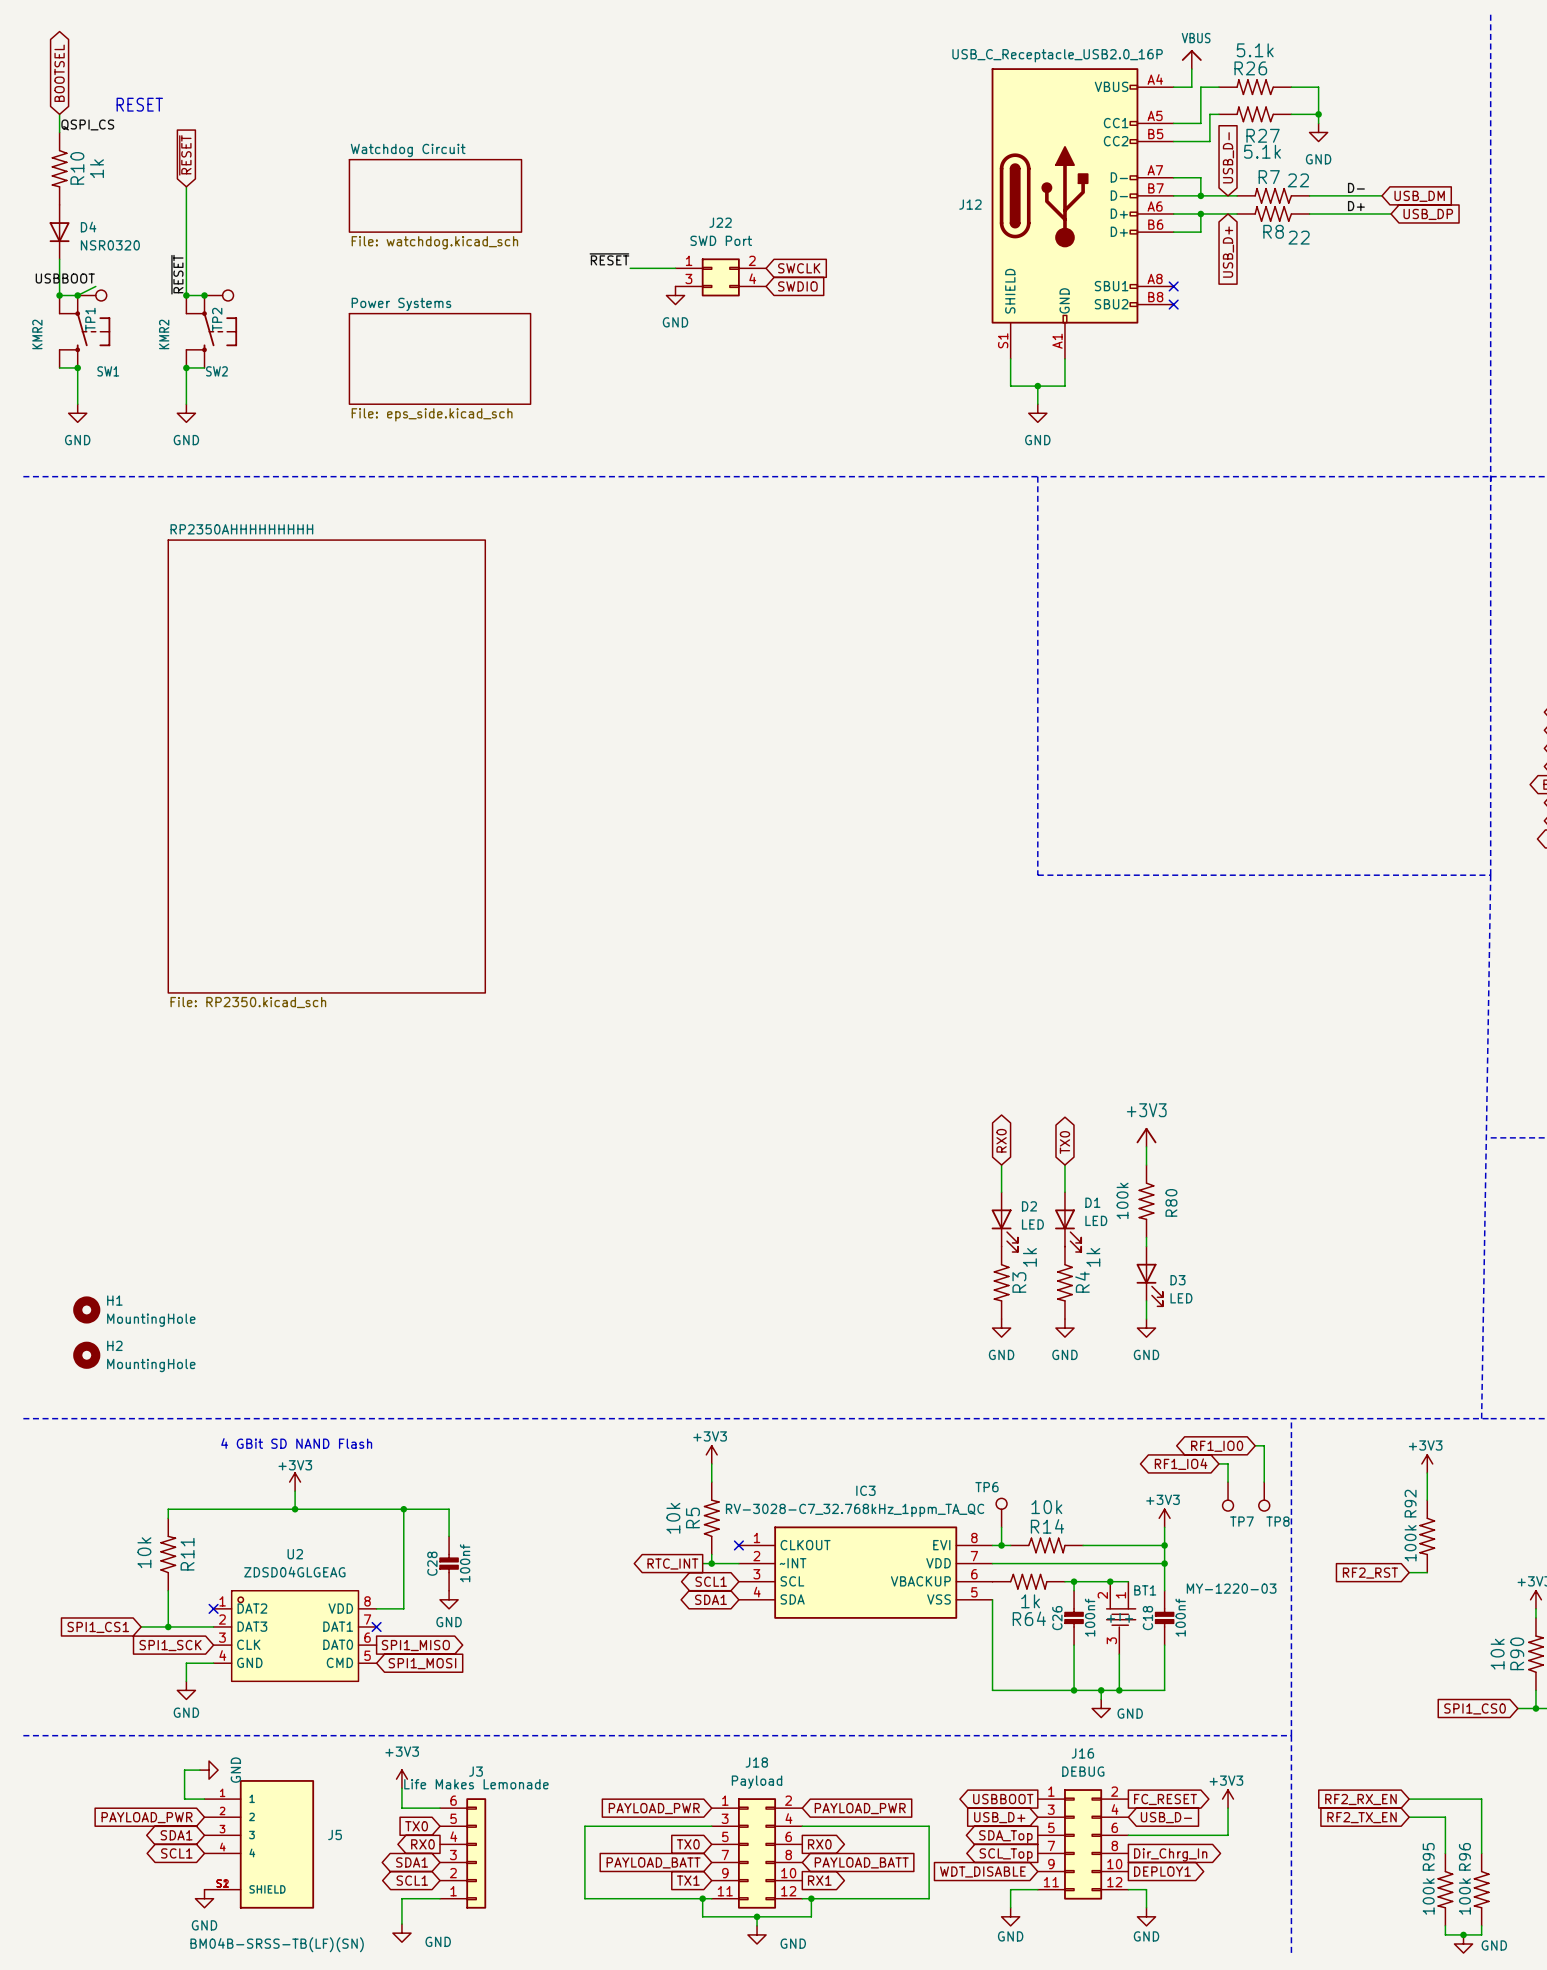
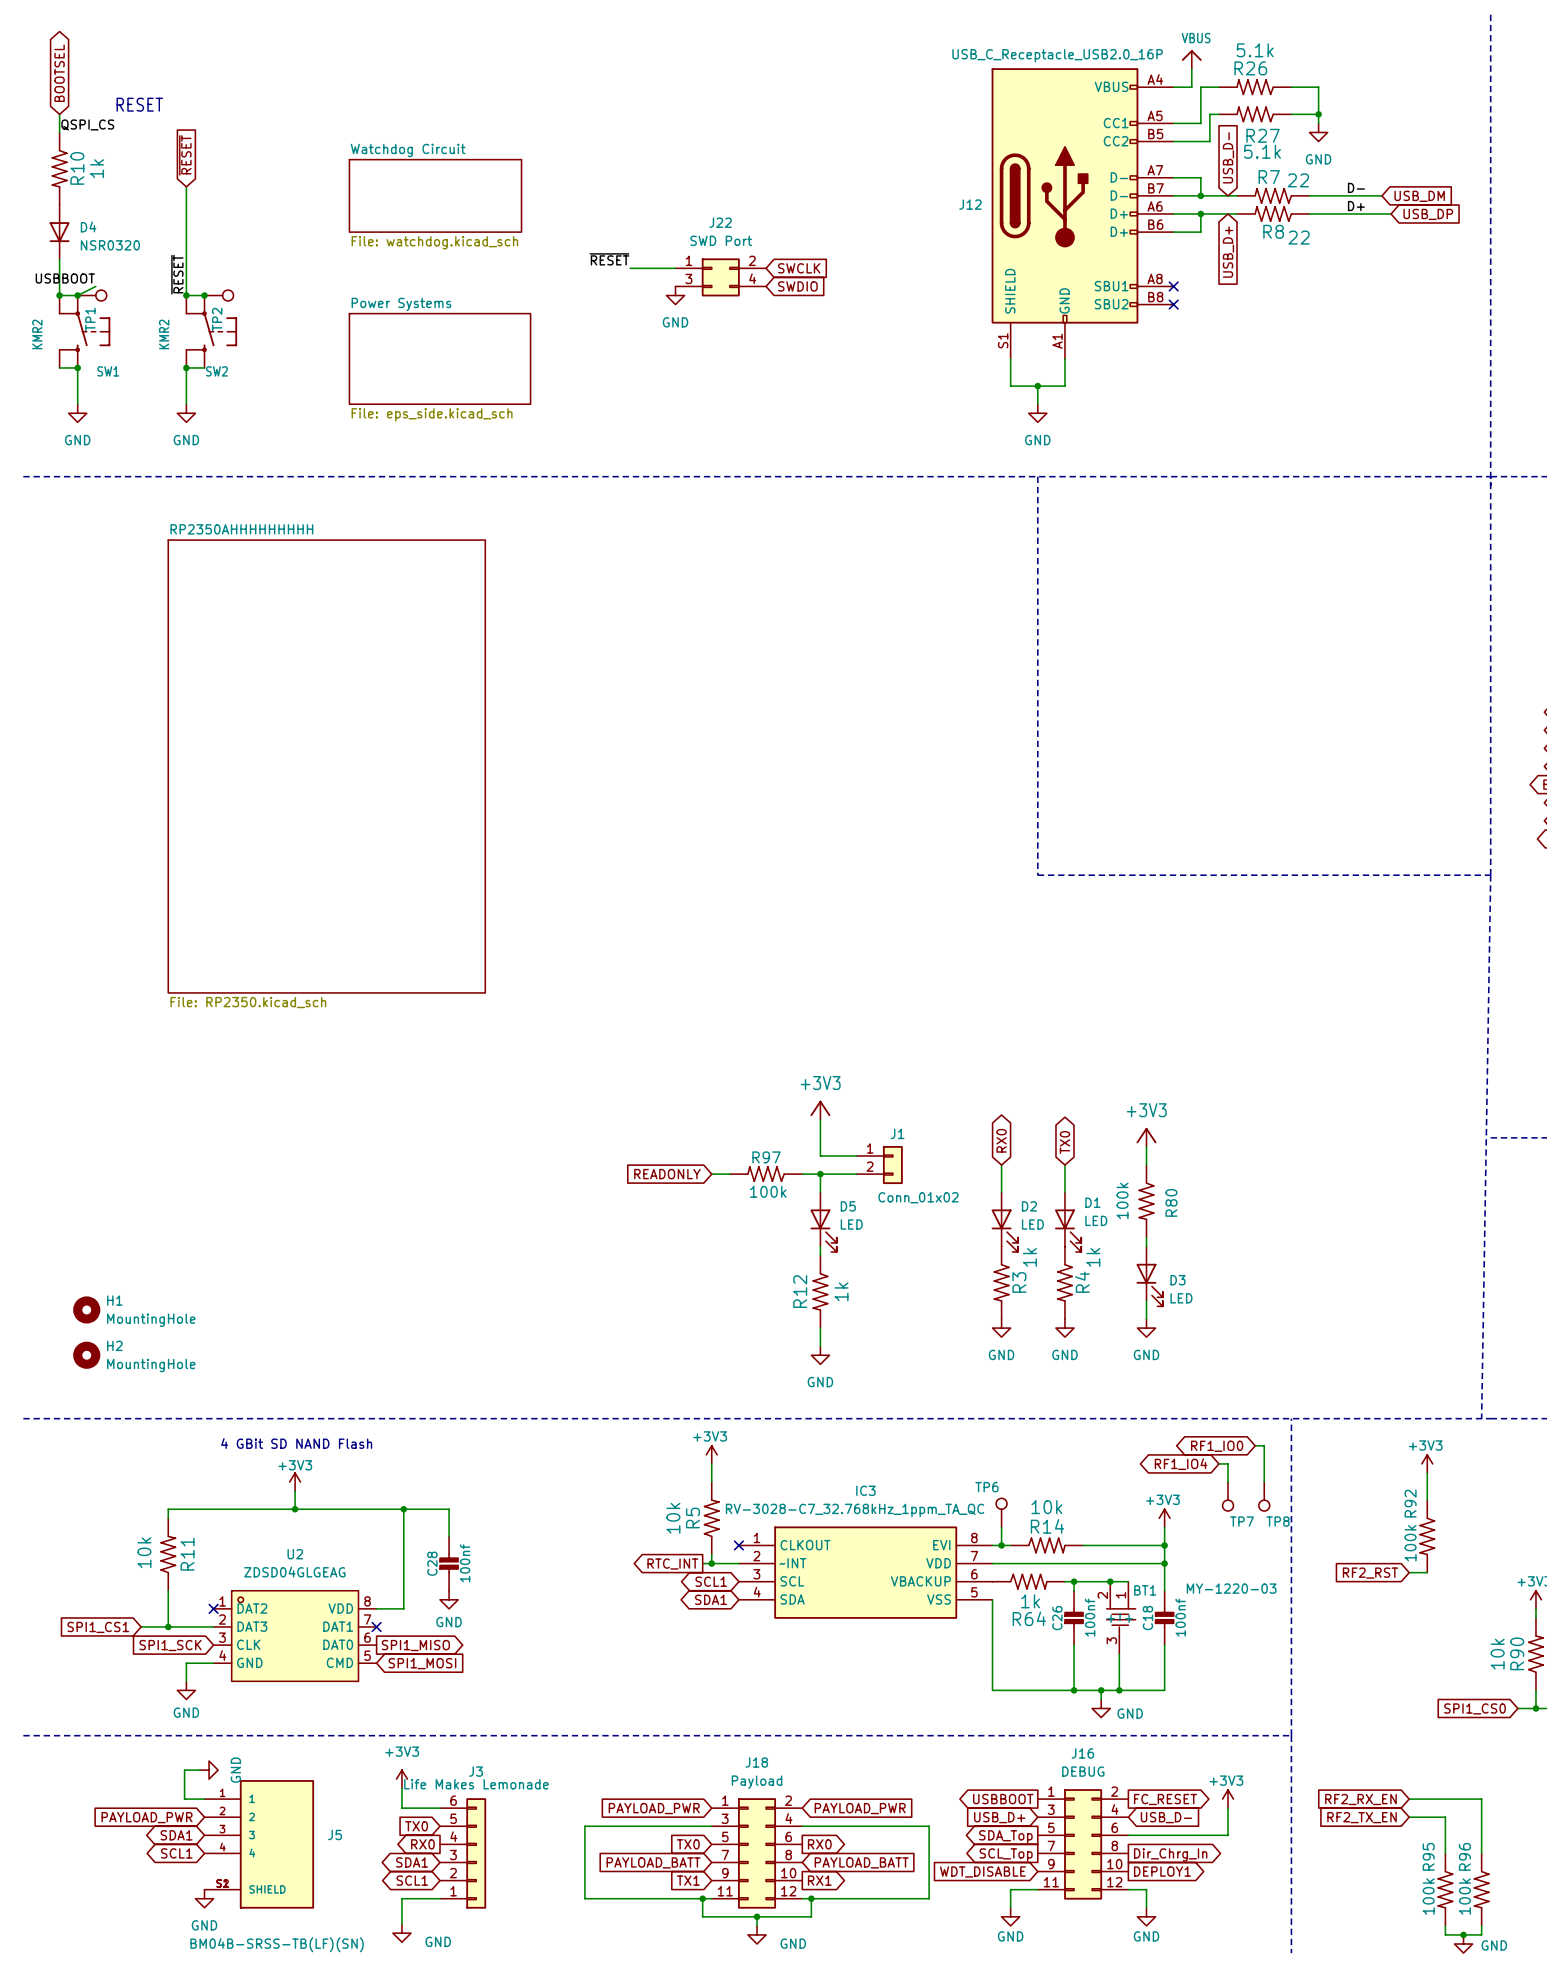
power symbol: none -> +3V3 (820, 1110)
wire: none -> (820, 1119) (820, 1155) (856, 1155)
J1: none -> Conn_01x02 (879, 1165)
global label: none -> READONLY (667, 1174)
wire: none -> (711, 1174) (729, 1174)
R97: none -> 100k (766, 1174)
wire: none -> (802, 1174) (856, 1174)
wire: none -> (820, 1174) (820, 1192)
junction: none -> (820, 1174)
D5: none -> LED (823, 1222)
wire: none -> (820, 1246) (820, 1255)
R12: none -> 1k (820, 1291)
wire: none -> (820, 1328) (820, 1346)
power symbol: none -> GND (820, 1355)

